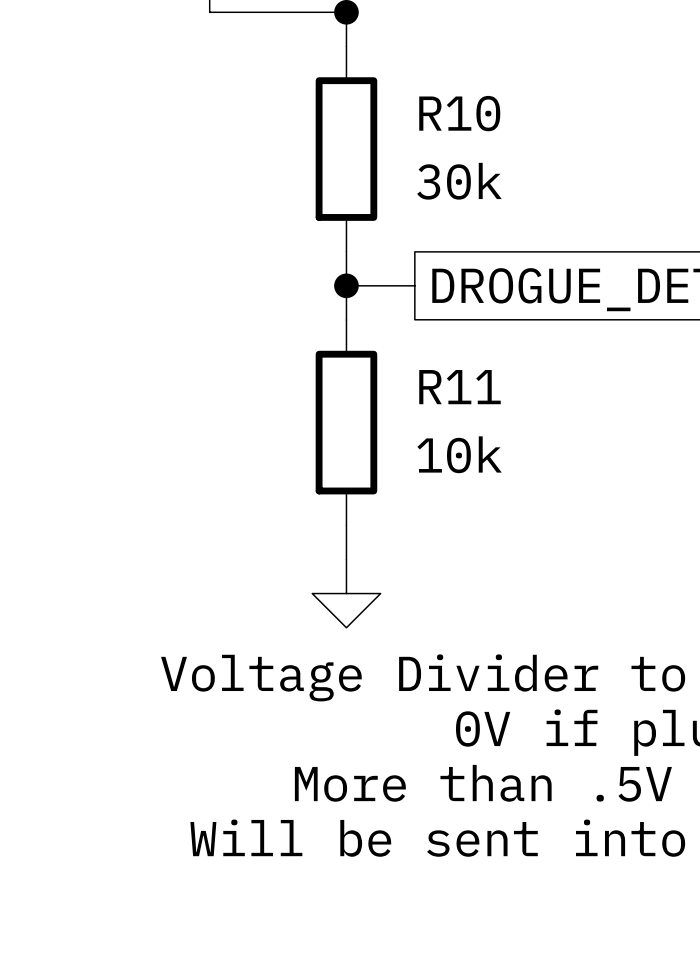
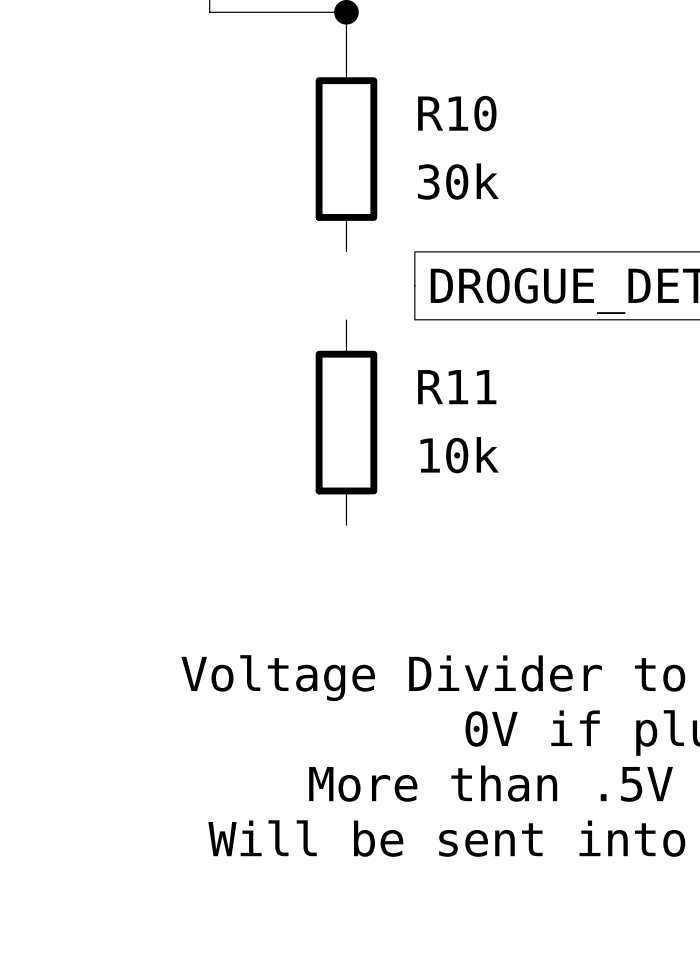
wire: (346, 251) (346, 320) -> none
wire: (346, 285) (414, 285) -> none
junction: (346, 285) -> none
wire: (346, 525) (346, 559) -> none
power symbol: (346, 593) -> none

